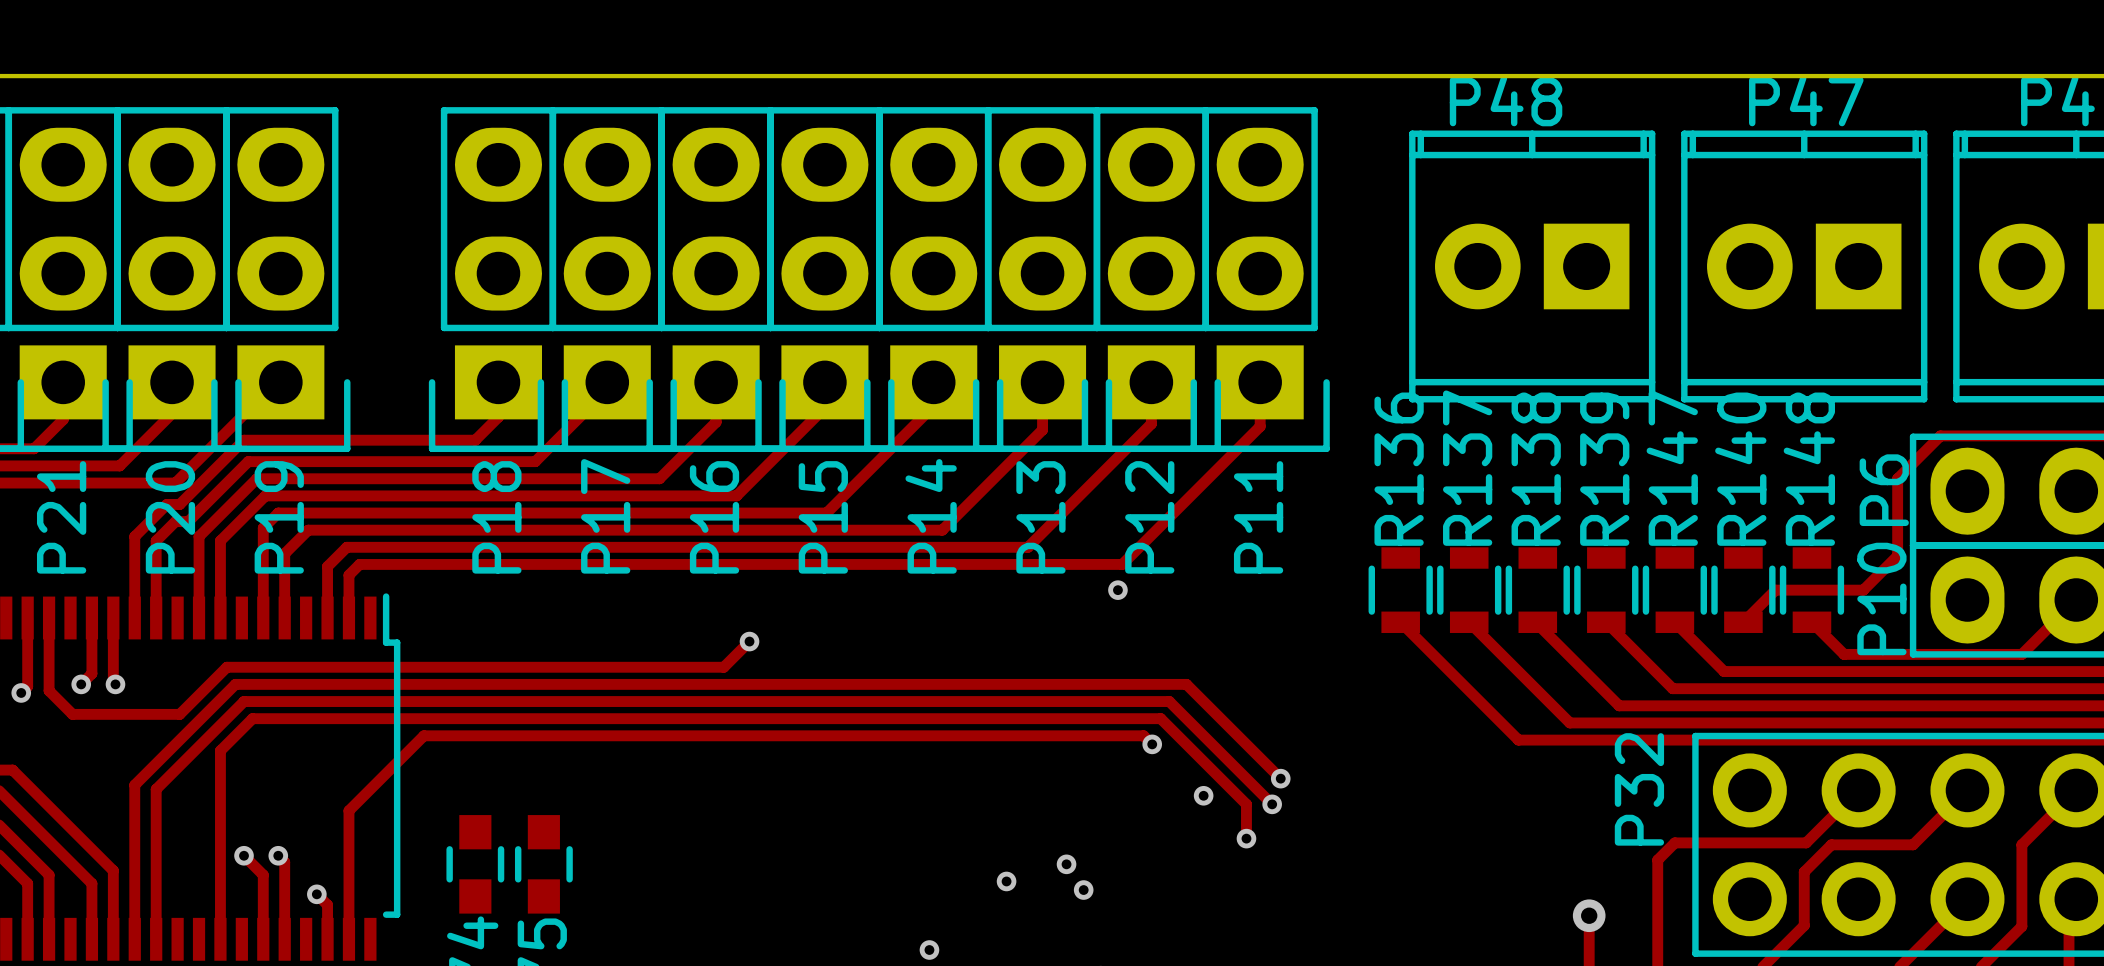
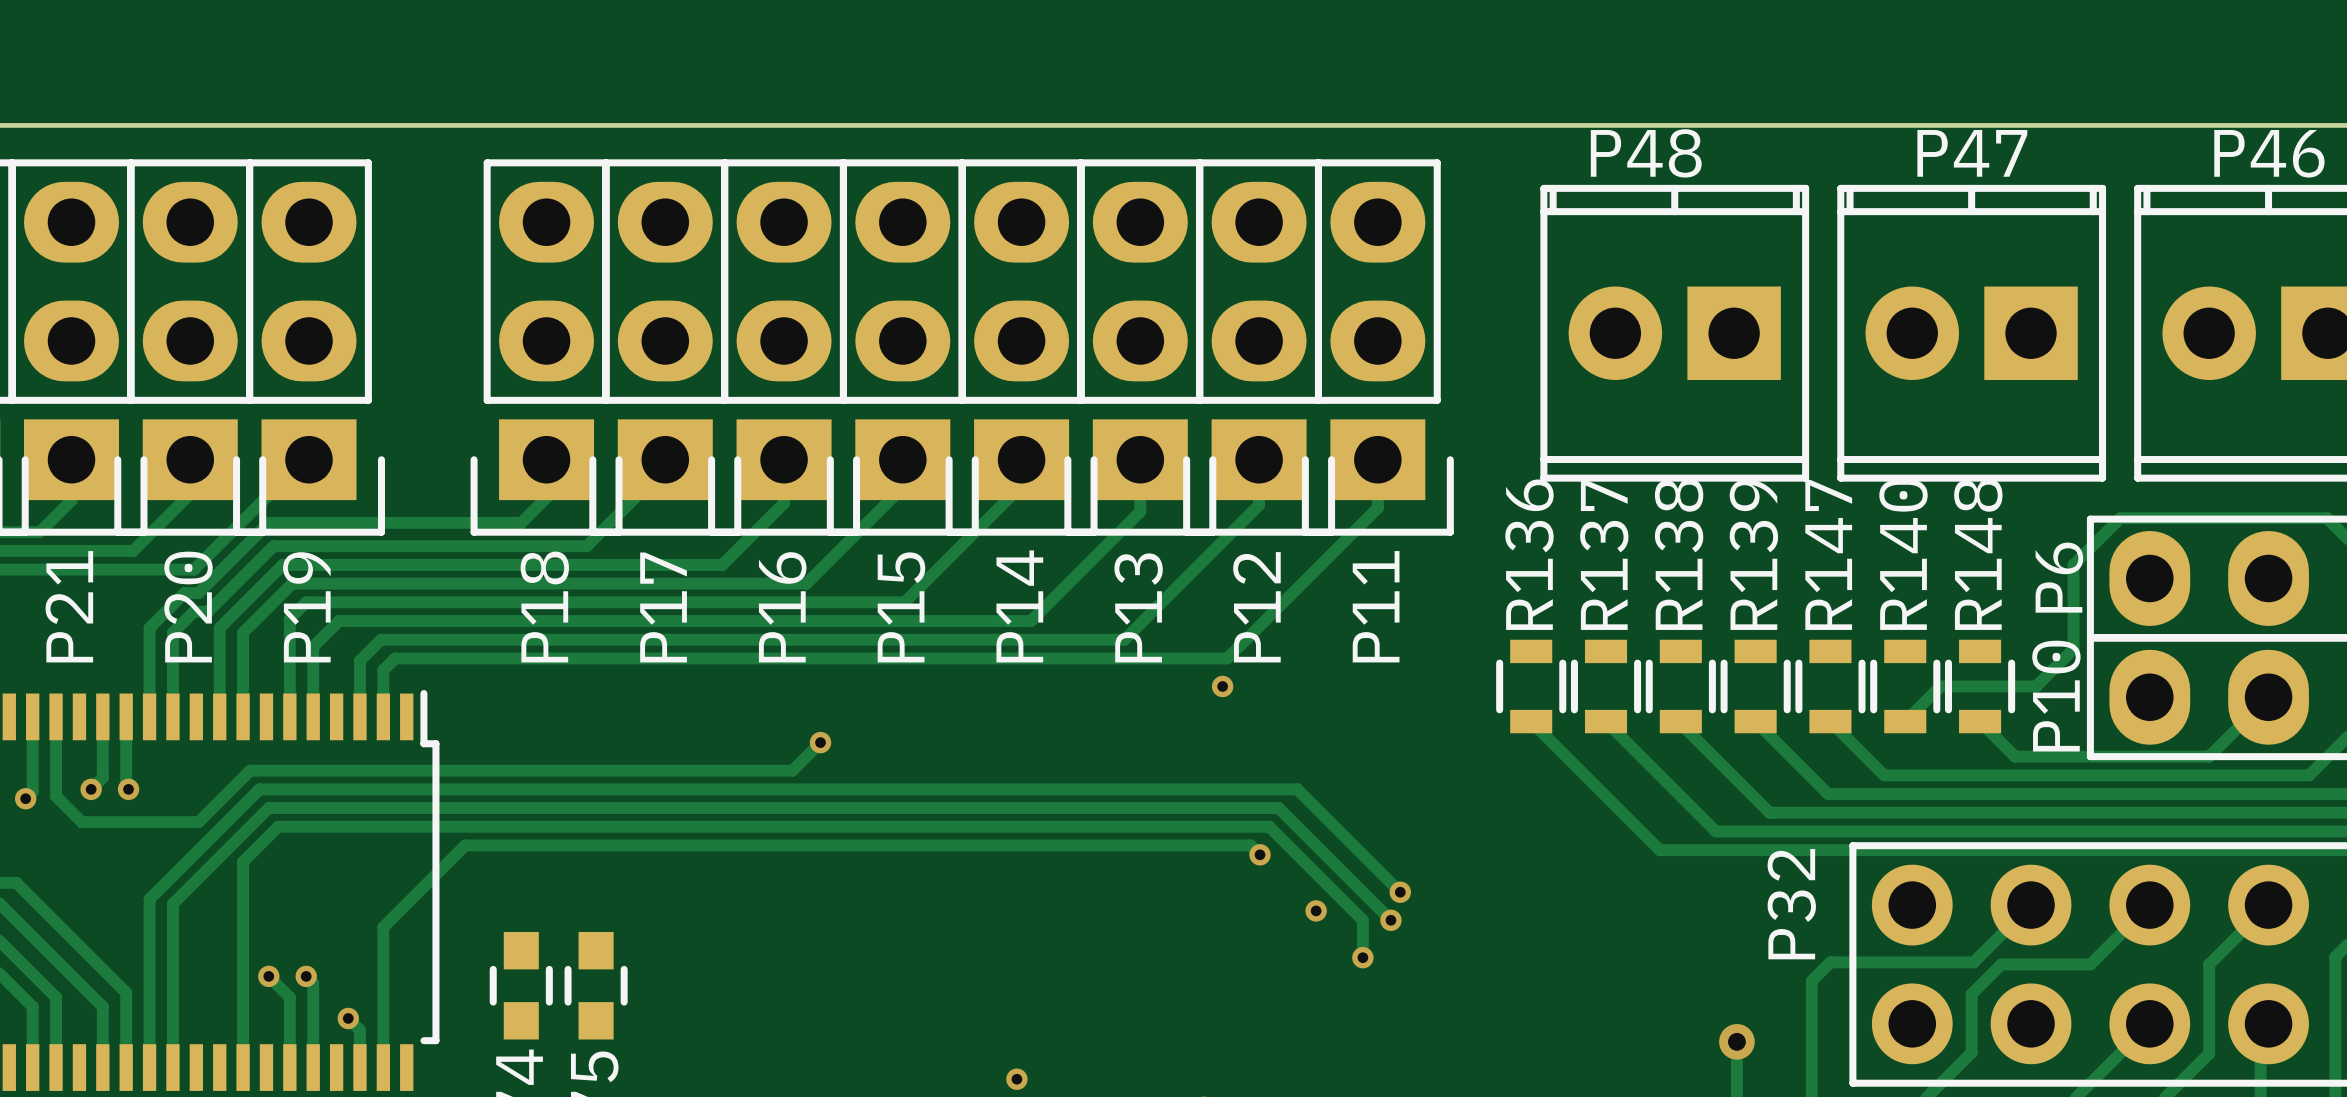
via: (1066, 864) -> none
via: (1006, 881) -> none
via: (1083, 890) -> none

